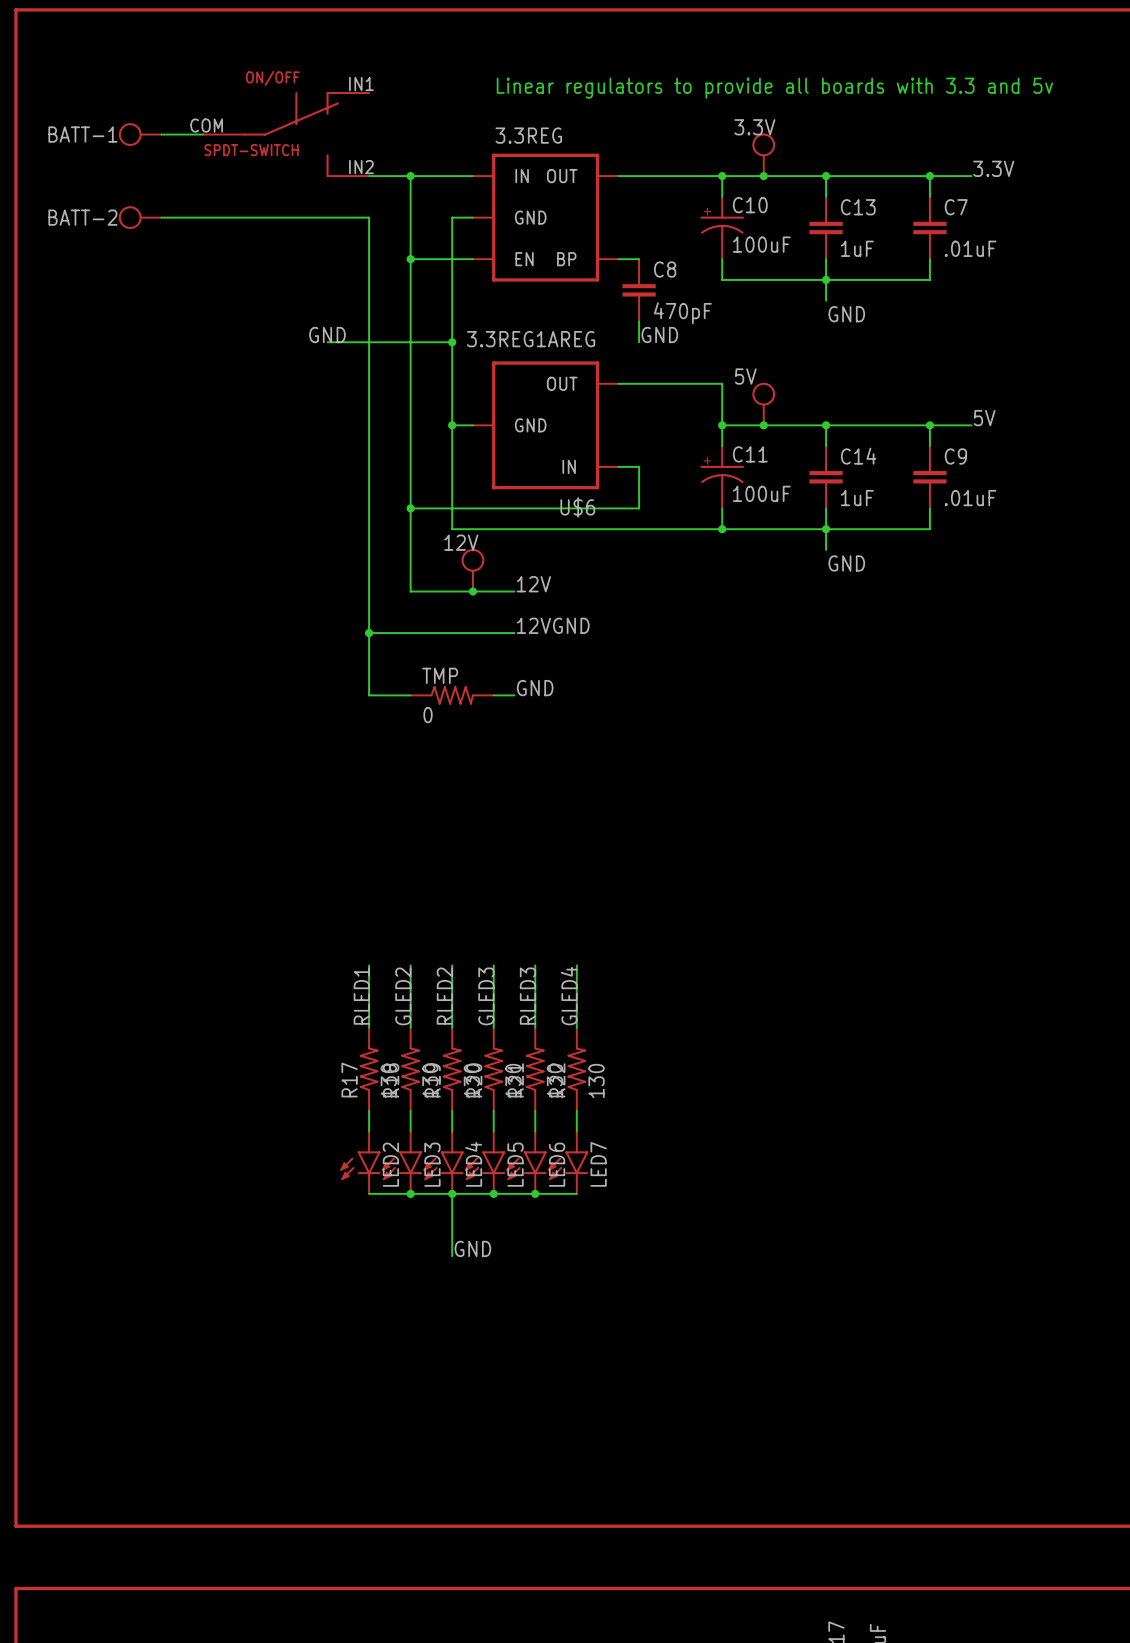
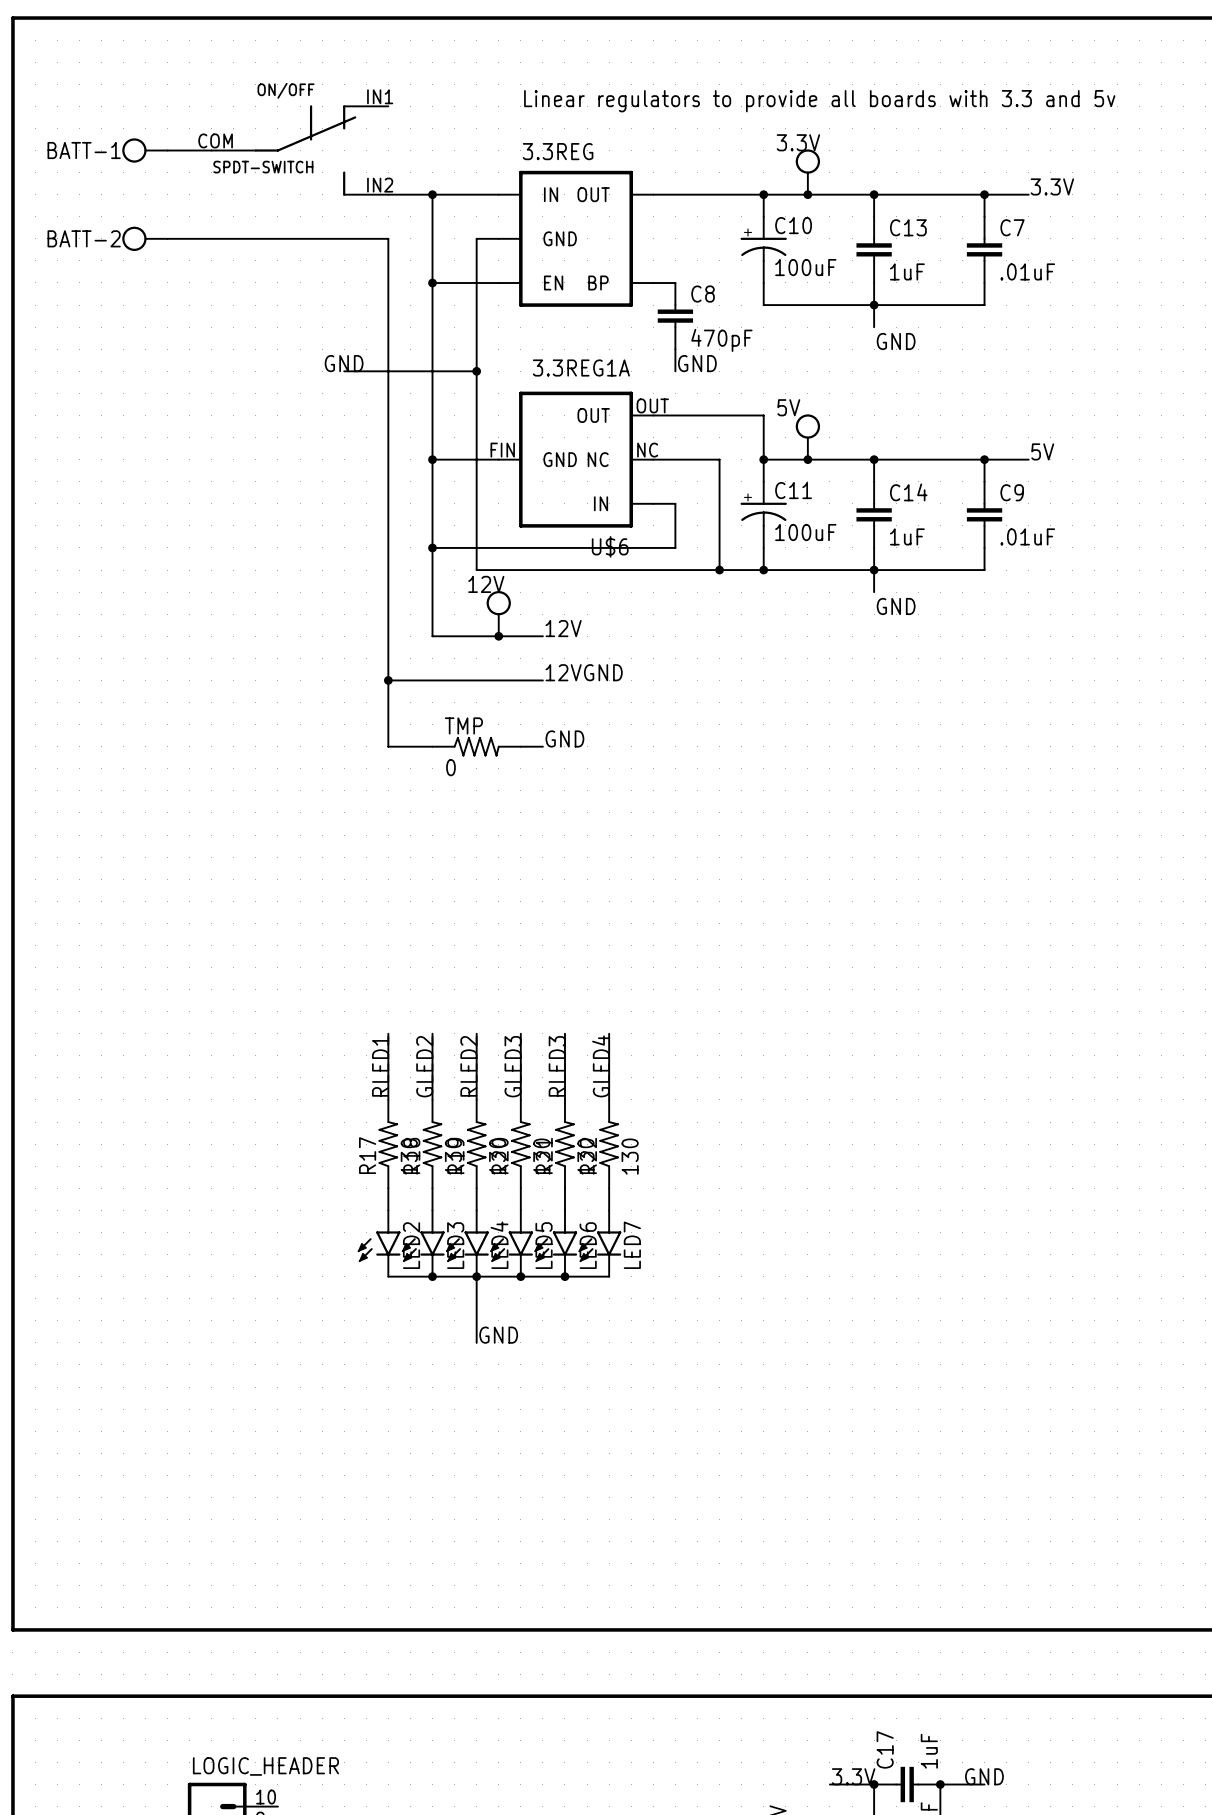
U$6 value: 3.3REG1AREG (531, 339) -> 3.3REG1A (581, 368)
U$6 symbol: [472, 361, 619, 490] -> [498, 391, 654, 528]
wire: none -> (432, 459) (476, 459)
junction position: (452, 425) -> (432, 459)
wire: none -> (653, 459) (719, 459) (719, 570)
junction: none -> (719, 570)

